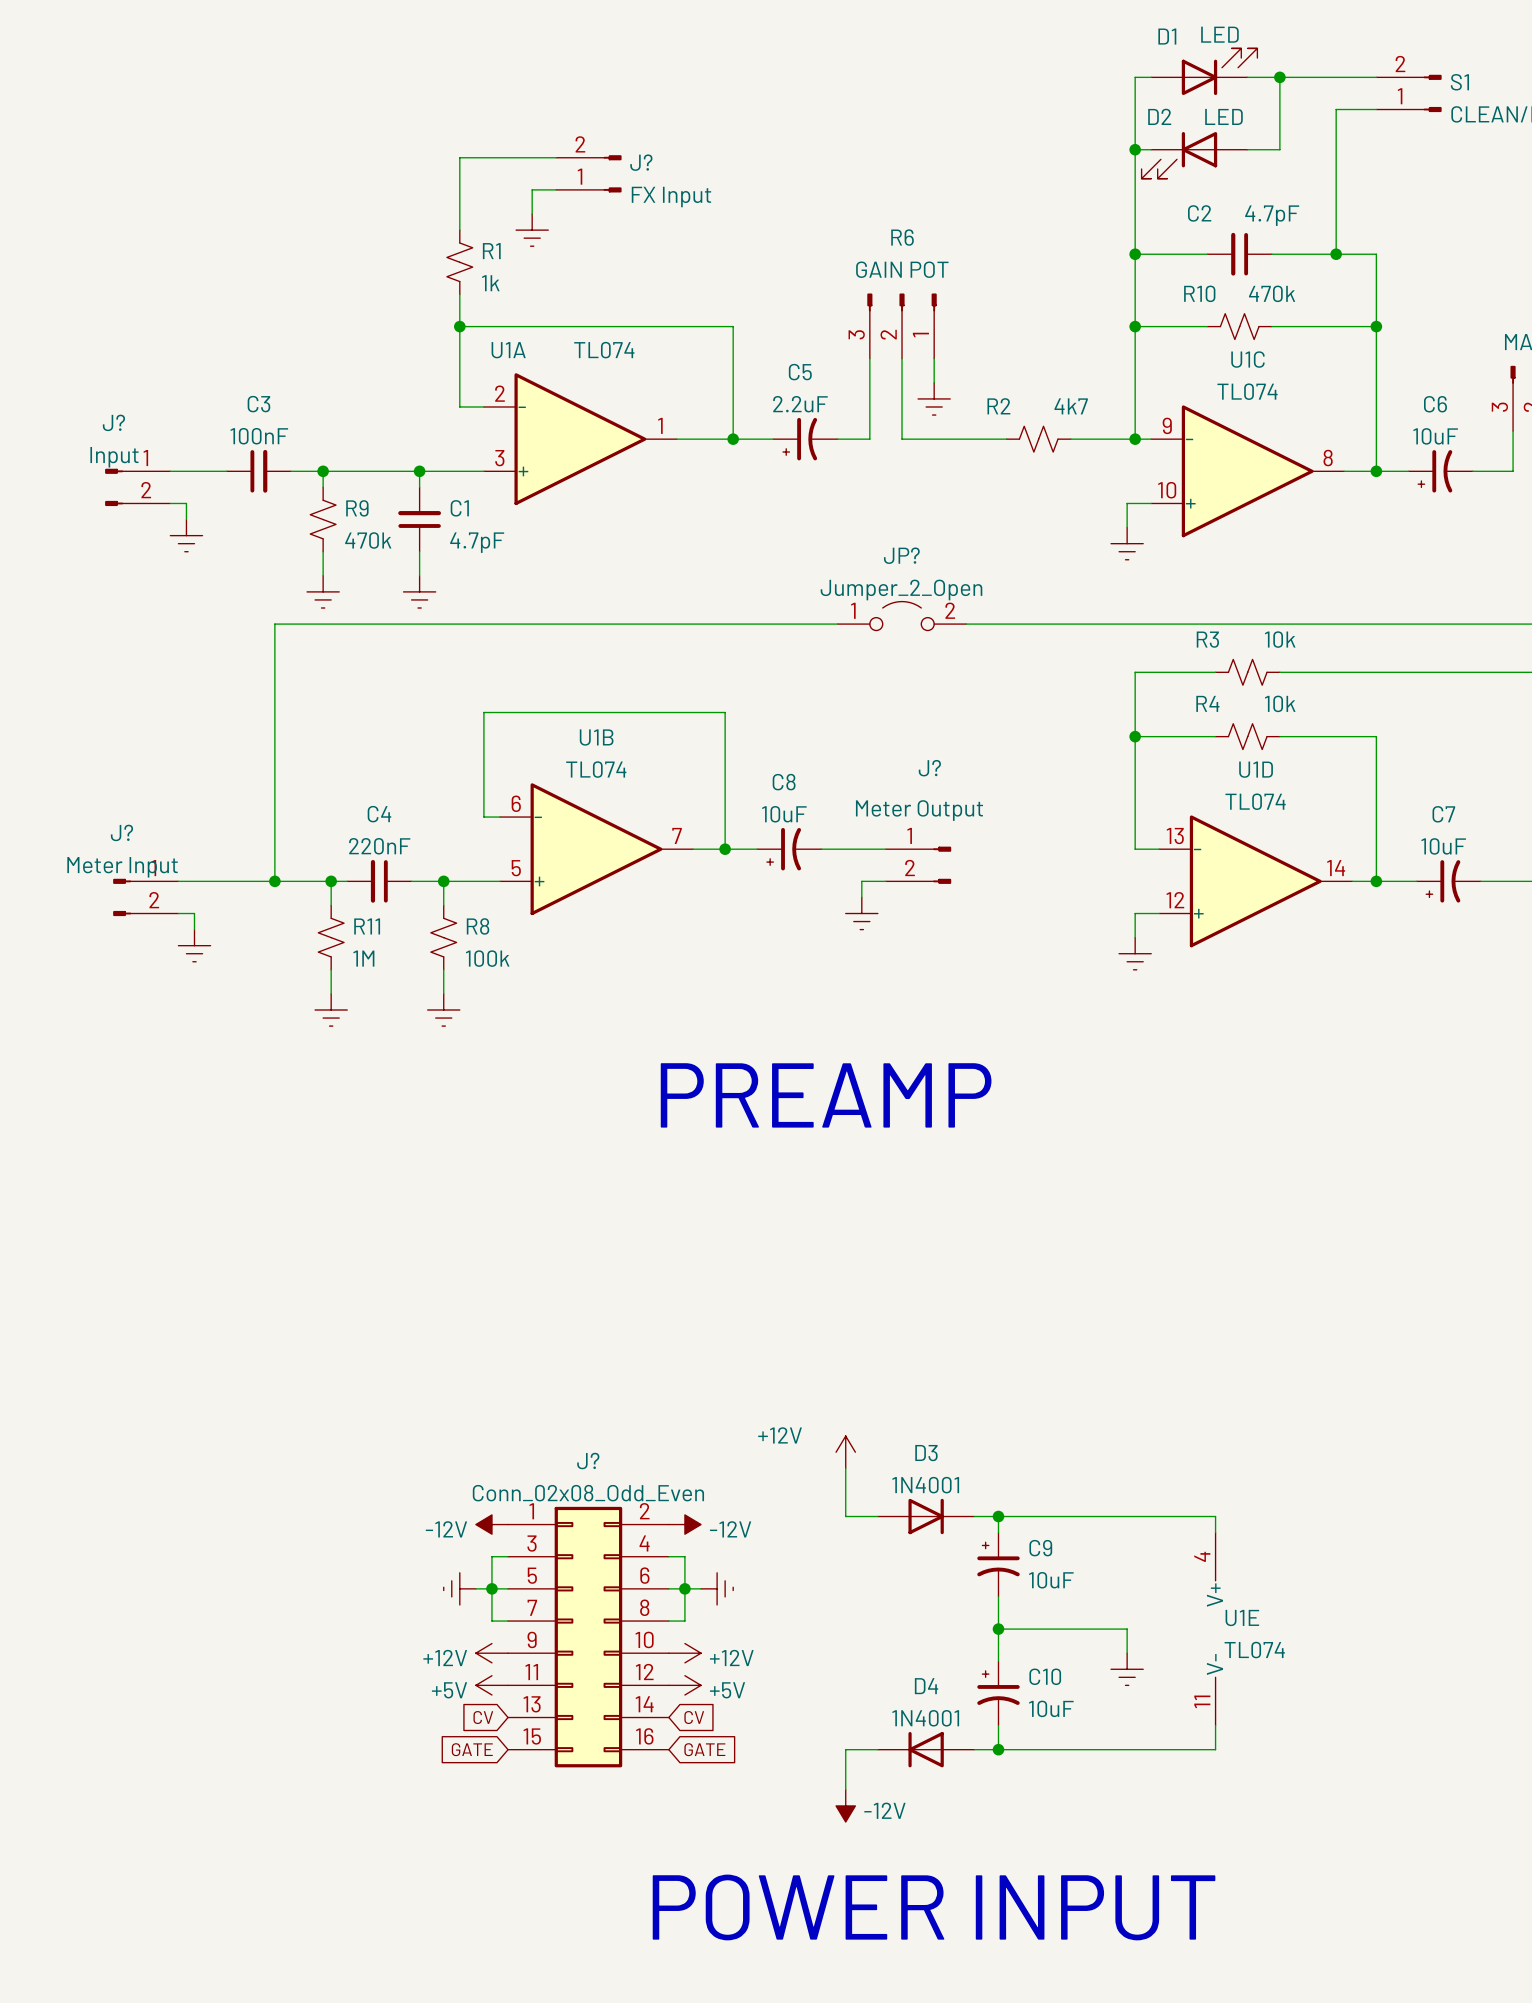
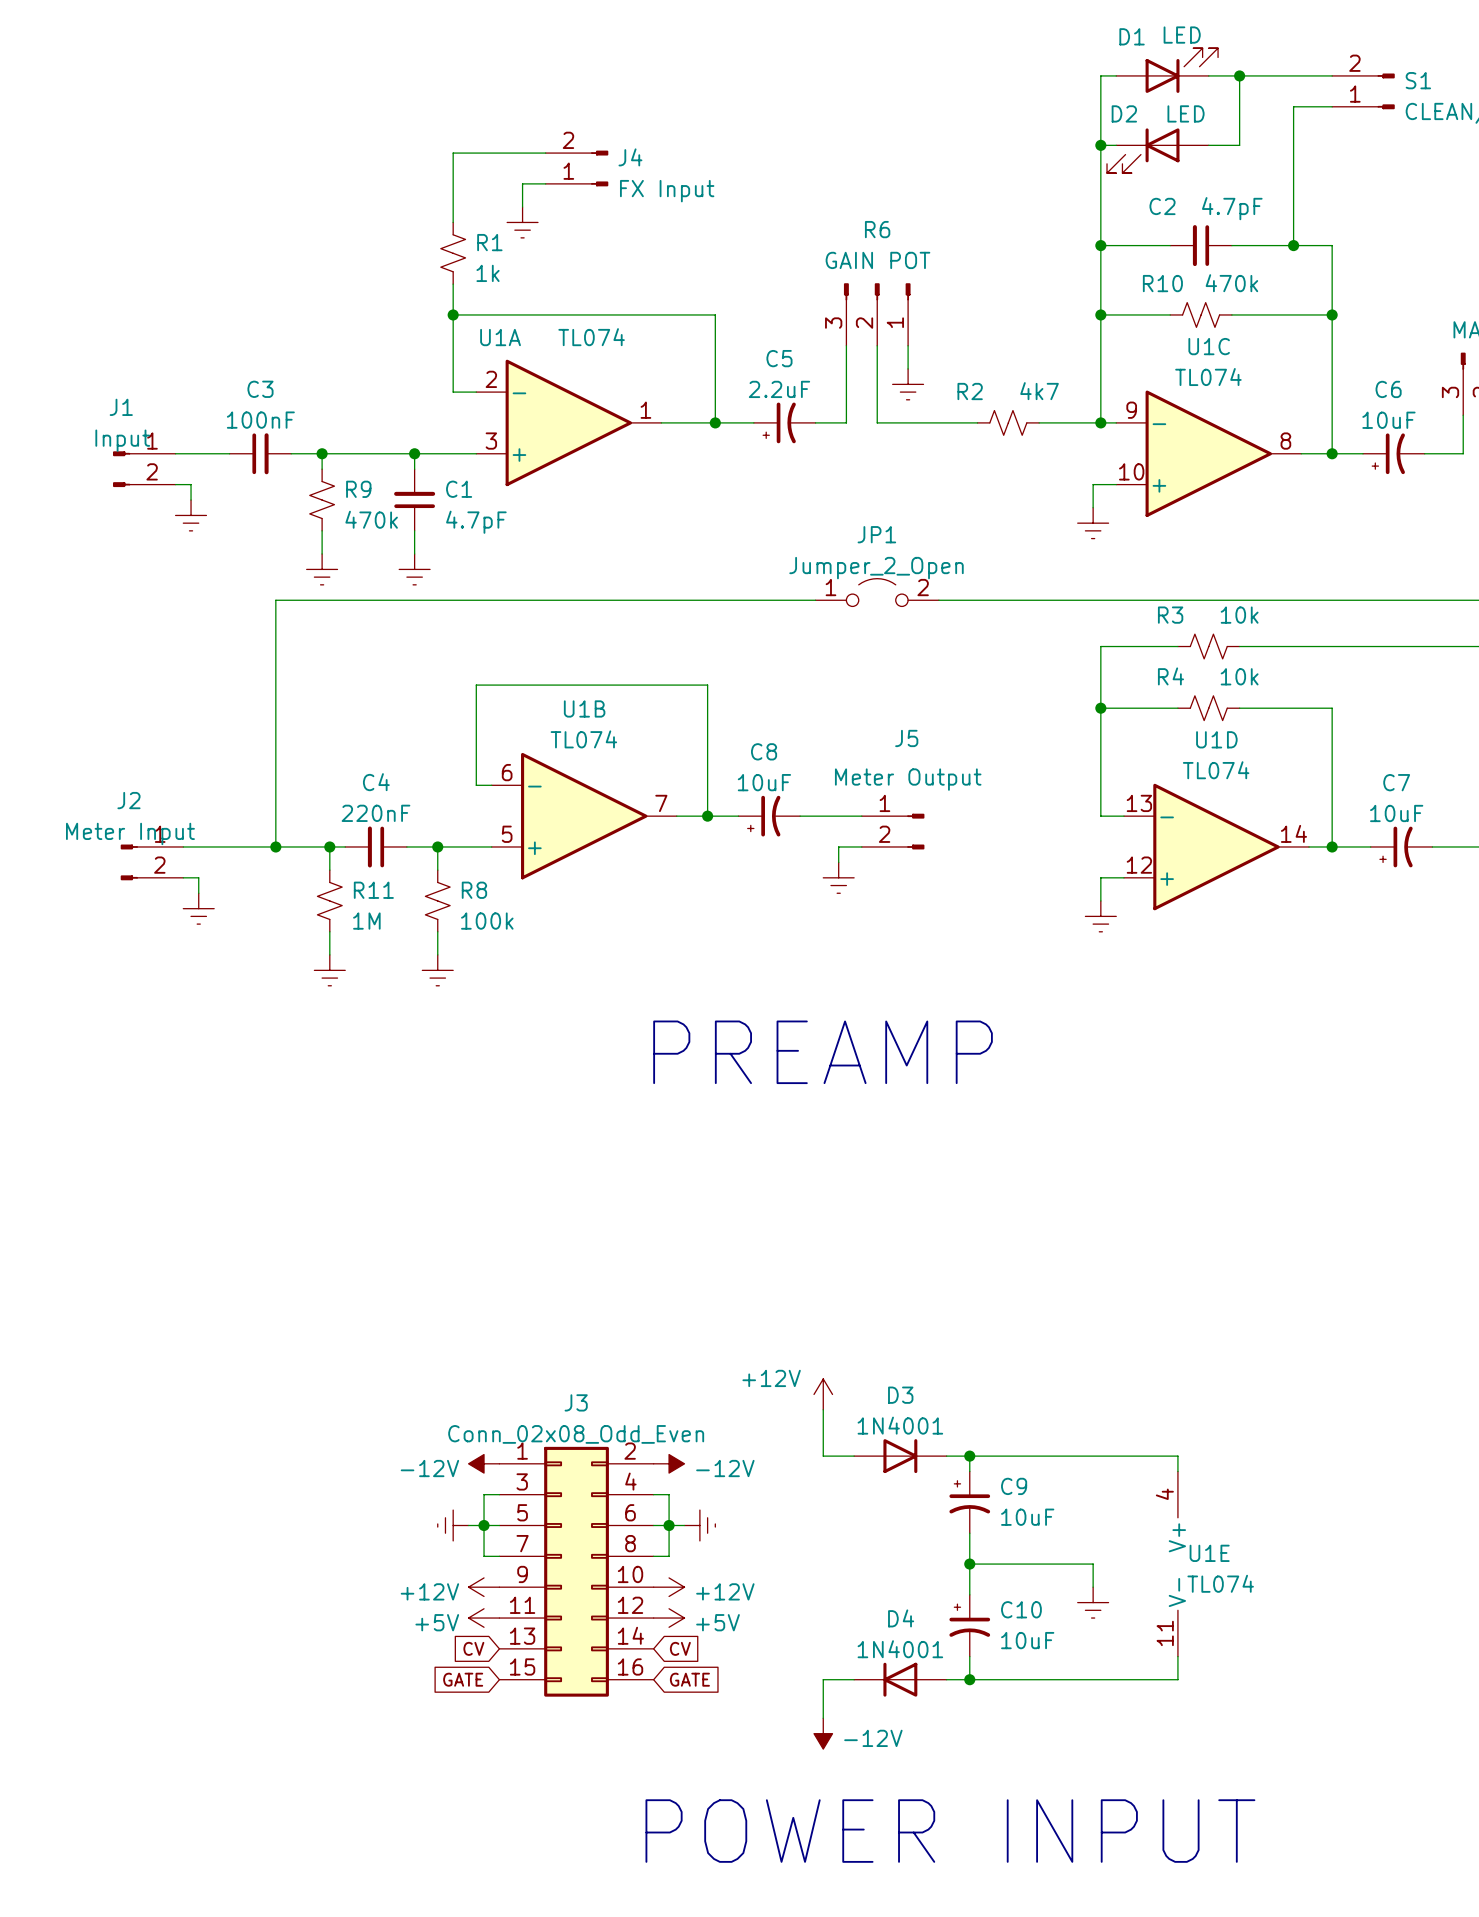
J? name: J? (641, 162) -> J4 (630, 157)
J? name: J? (113, 422) -> J1 (121, 407)
JP? name: JP? (901, 555) -> JP1 (876, 534)
J? name: J? (929, 768) -> J5 (906, 738)
J? name: J? (121, 832) -> J2 (128, 800)
J? name: J? (588, 1461) -> J3 (576, 1402)

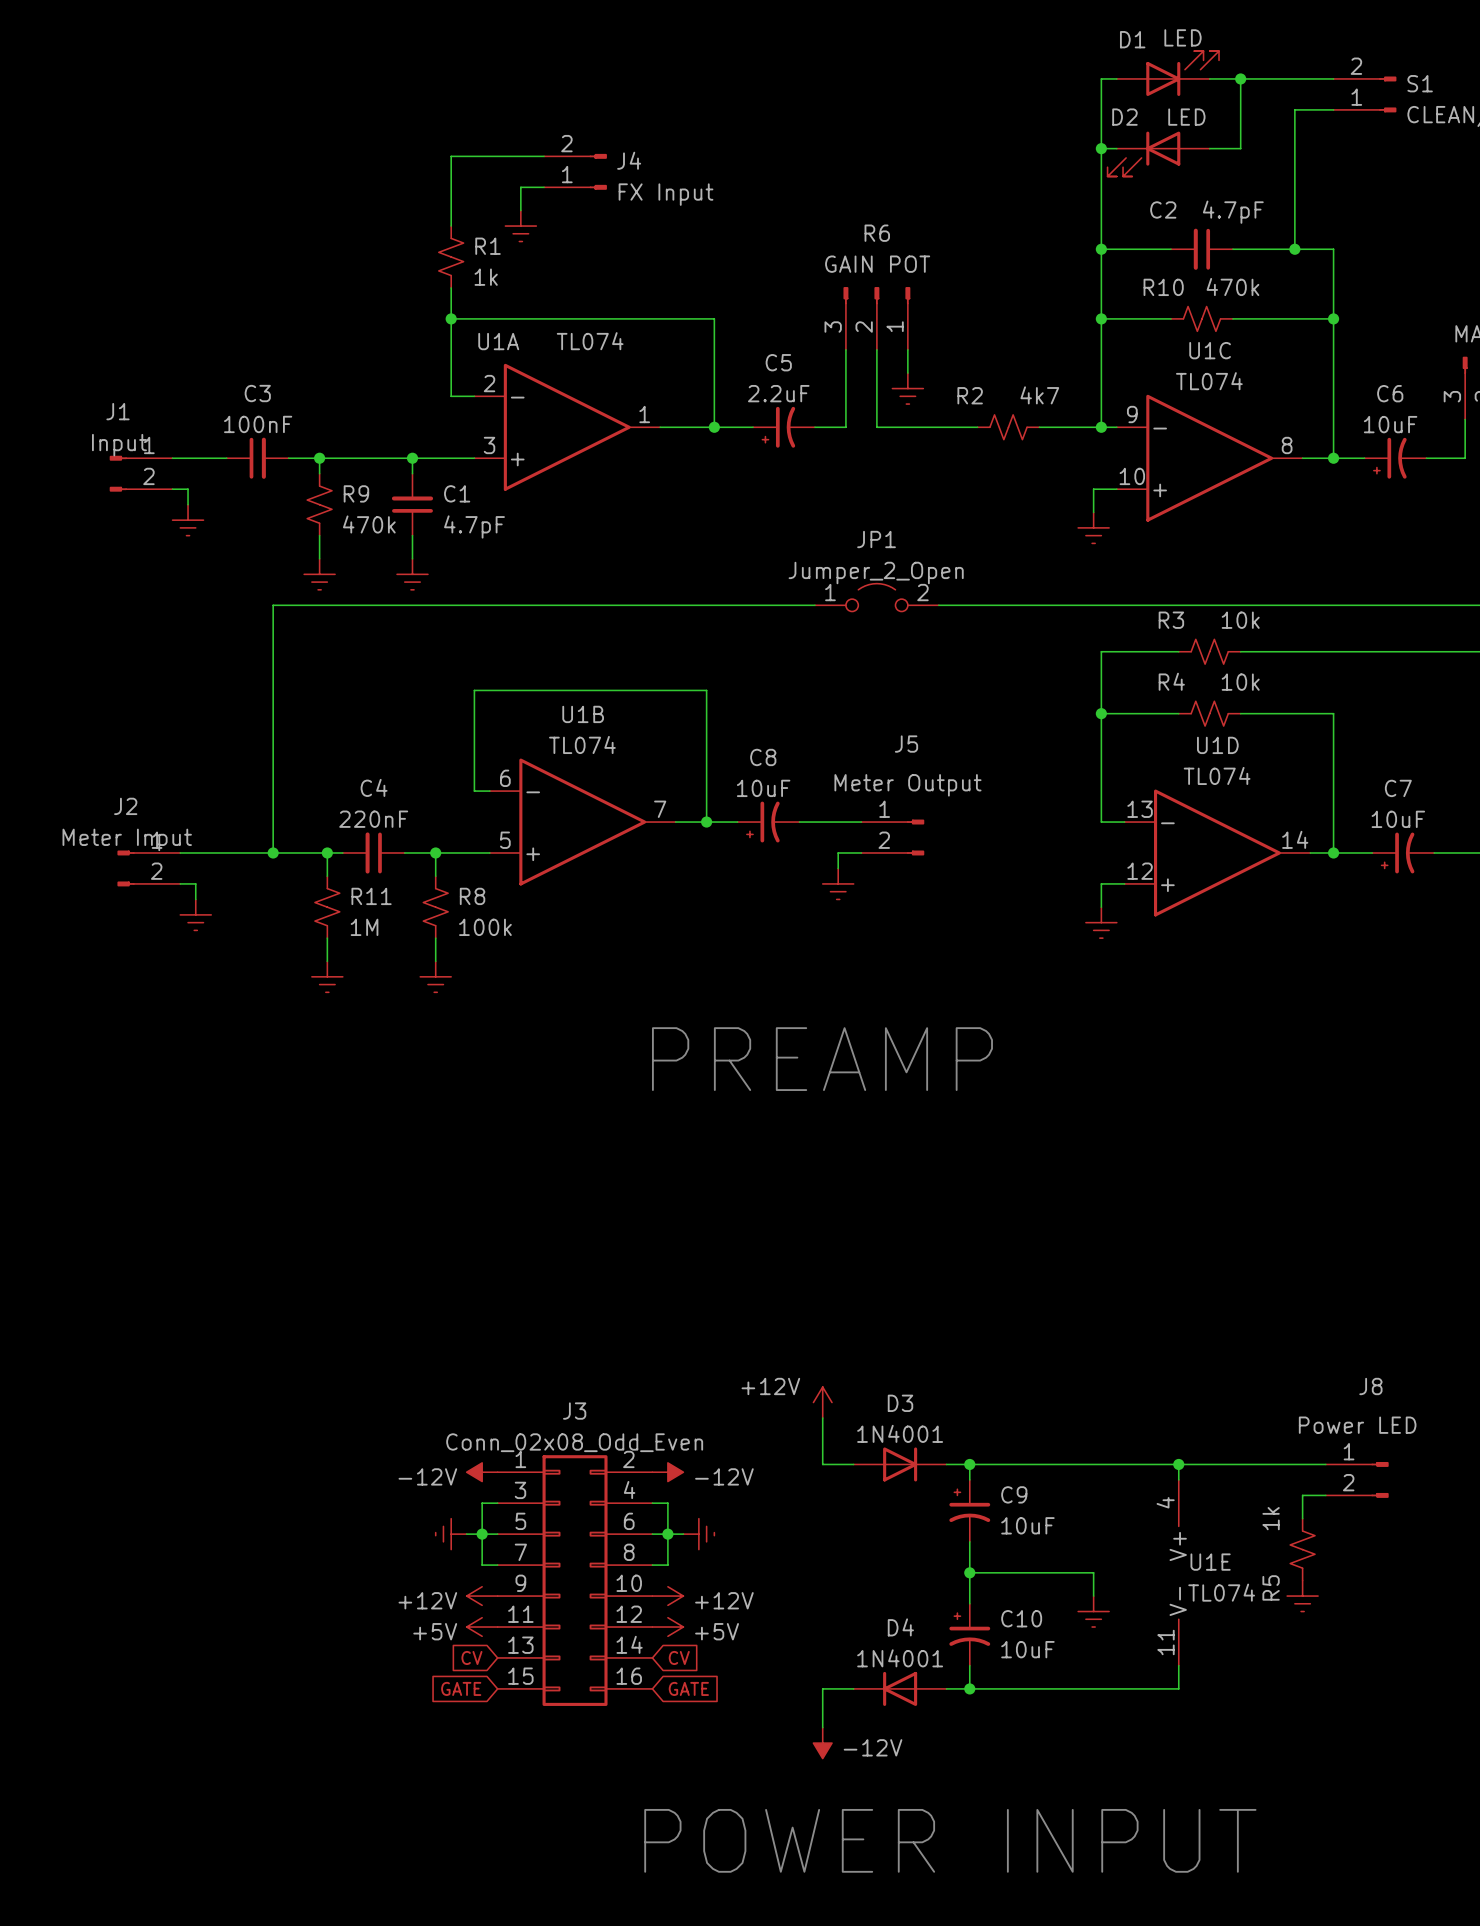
wire: none -> (1178, 1464) (1325, 1464)
junction: none -> (1178, 1464)
J8: none -> Power LED (1357, 1479)
wire: none -> (1325, 1495) (1302, 1495) (1302, 1518)
R5: none -> 1k (1302, 1549)
power symbol: none -> (1302, 1596)

